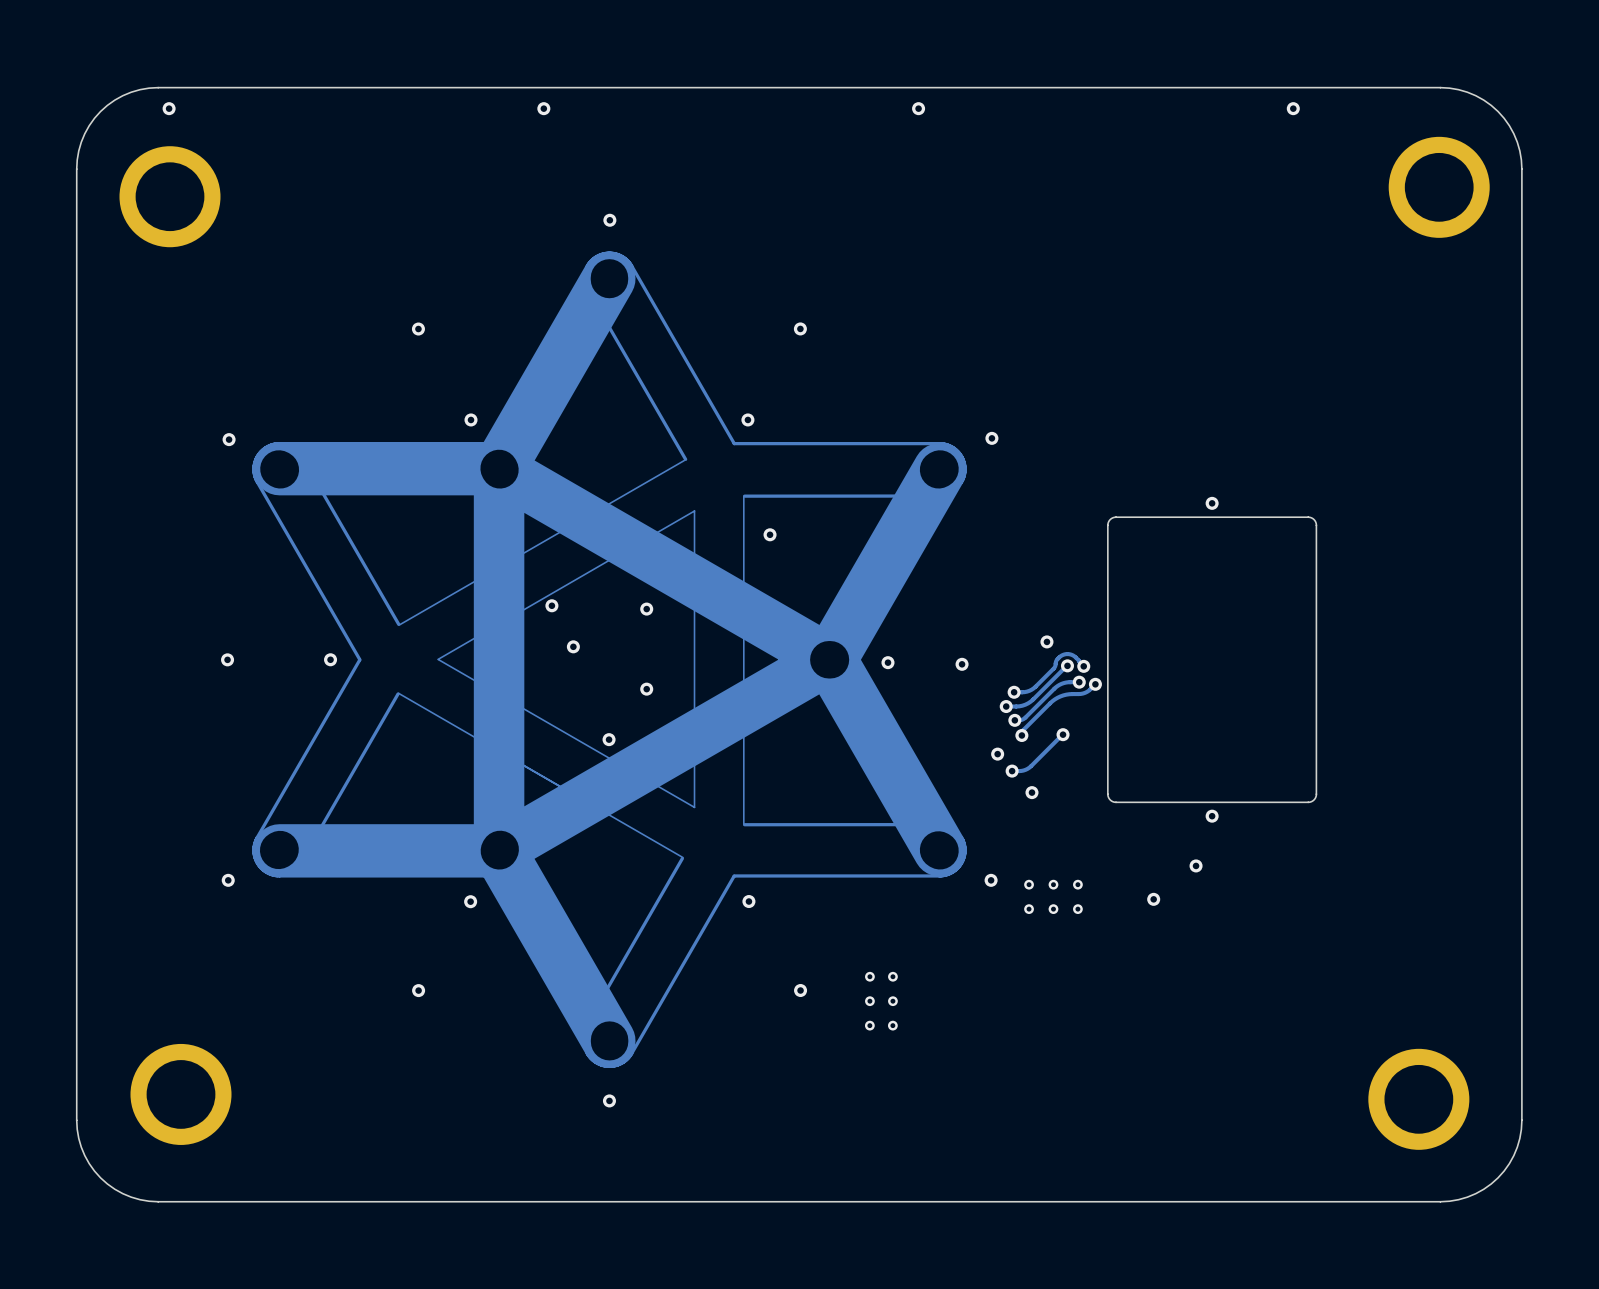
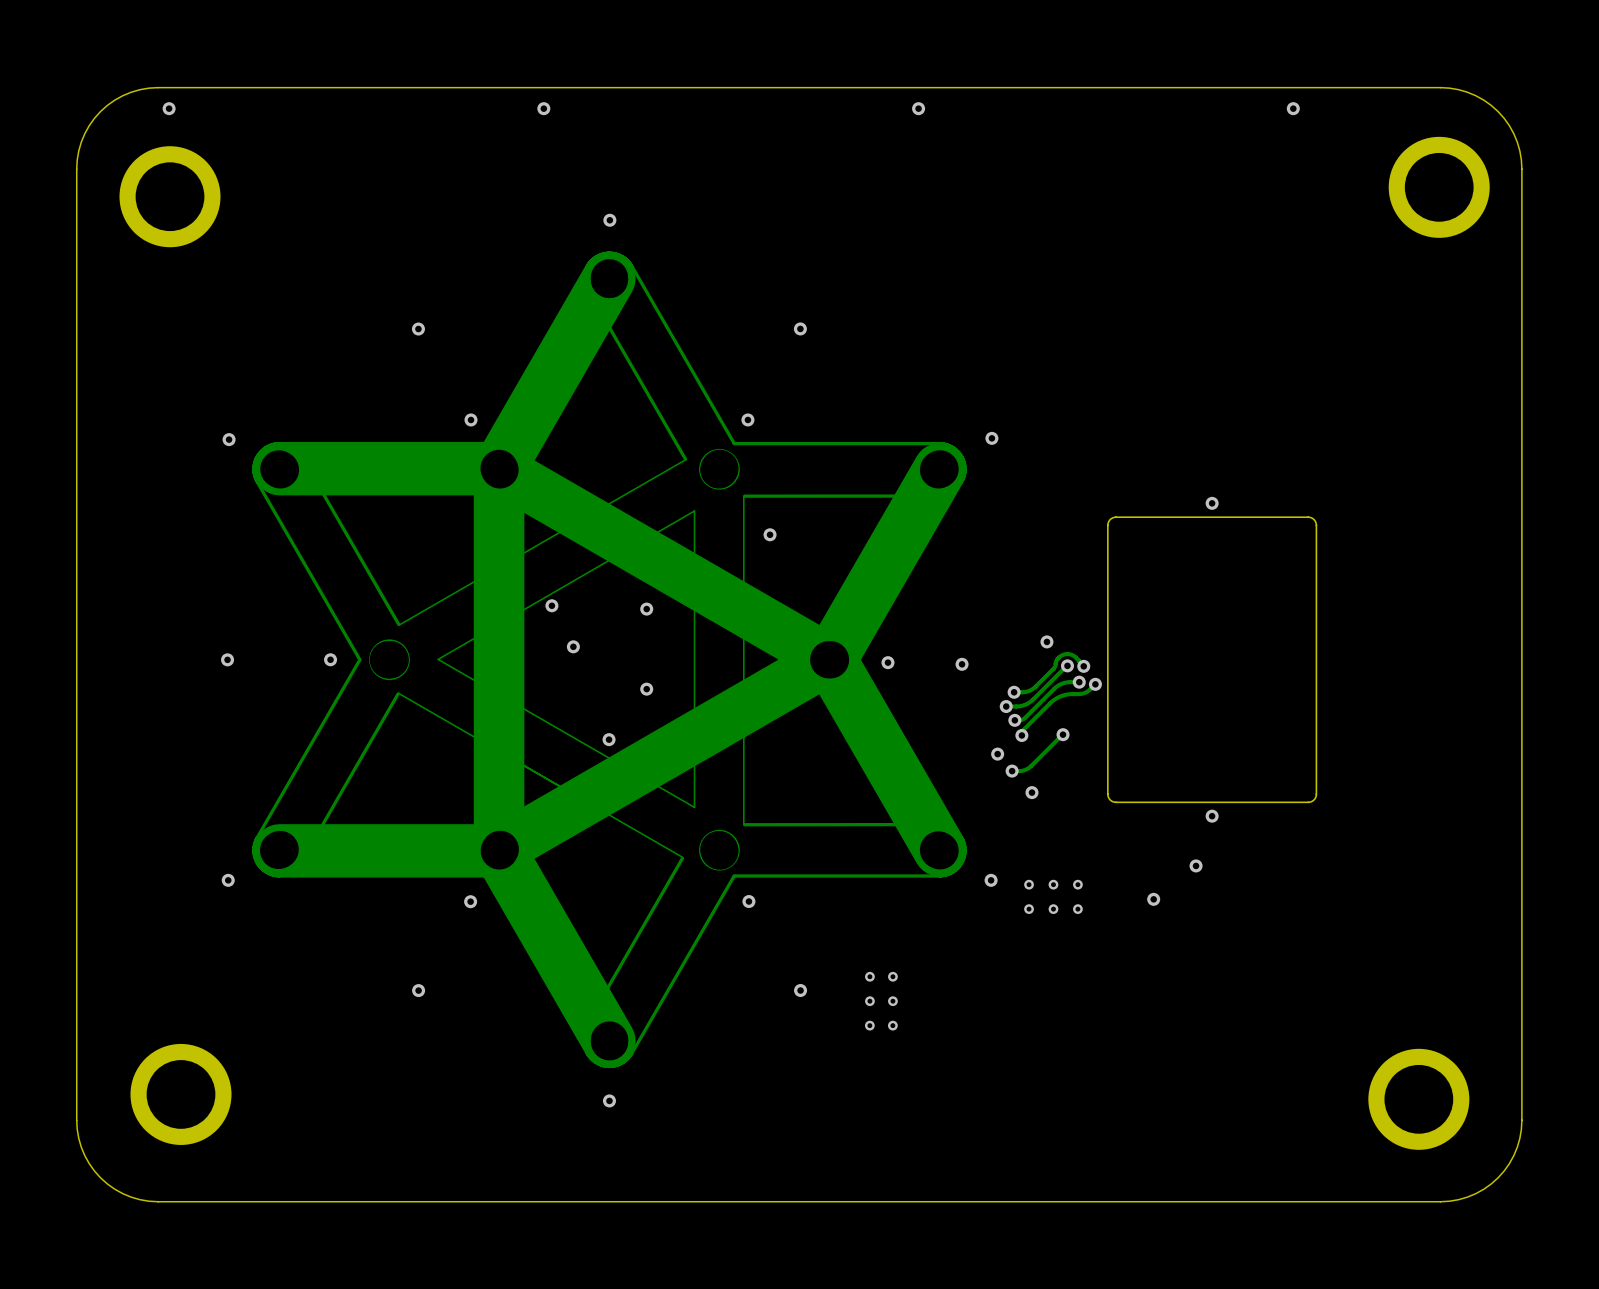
drawing shape: [252, 251, 967, 1069] -> [252, 251, 967, 1069]

